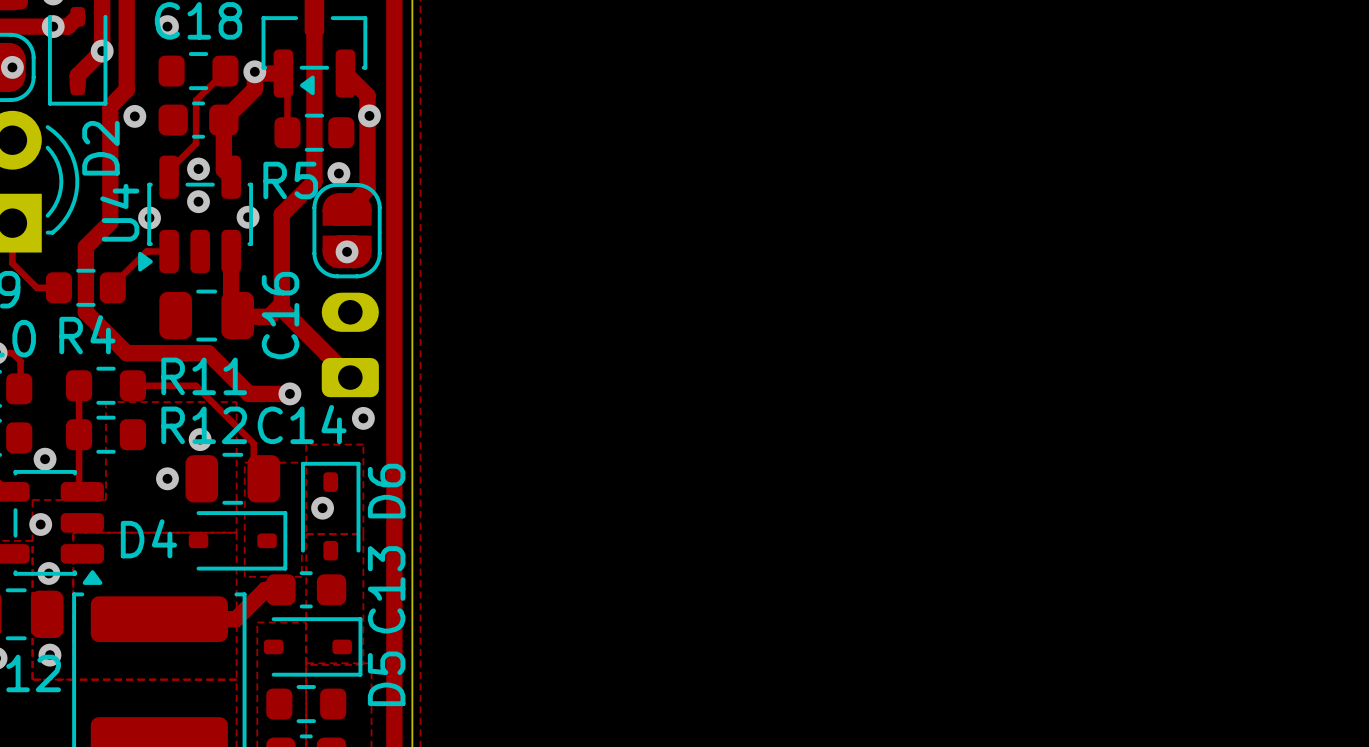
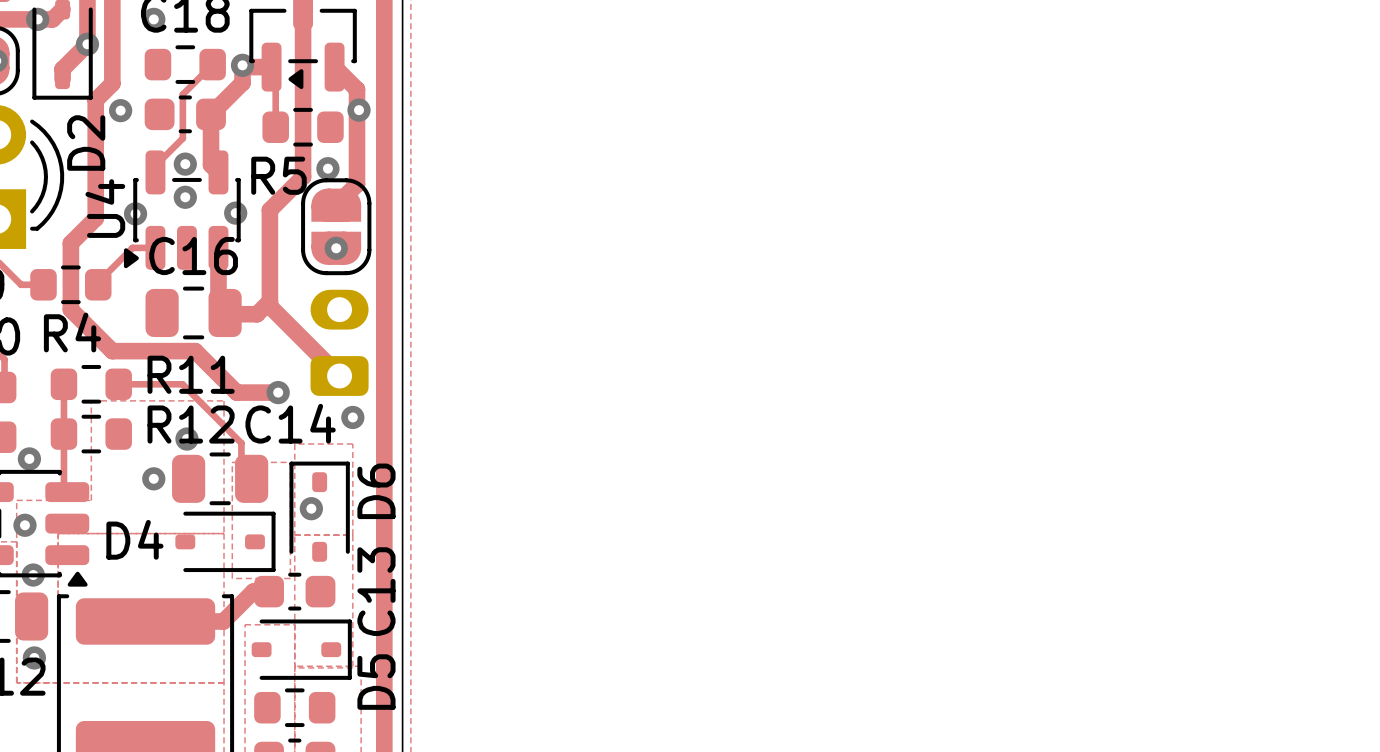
C16 name rotation: 0° (280, 315) -> 90° clockwise (193, 256)

